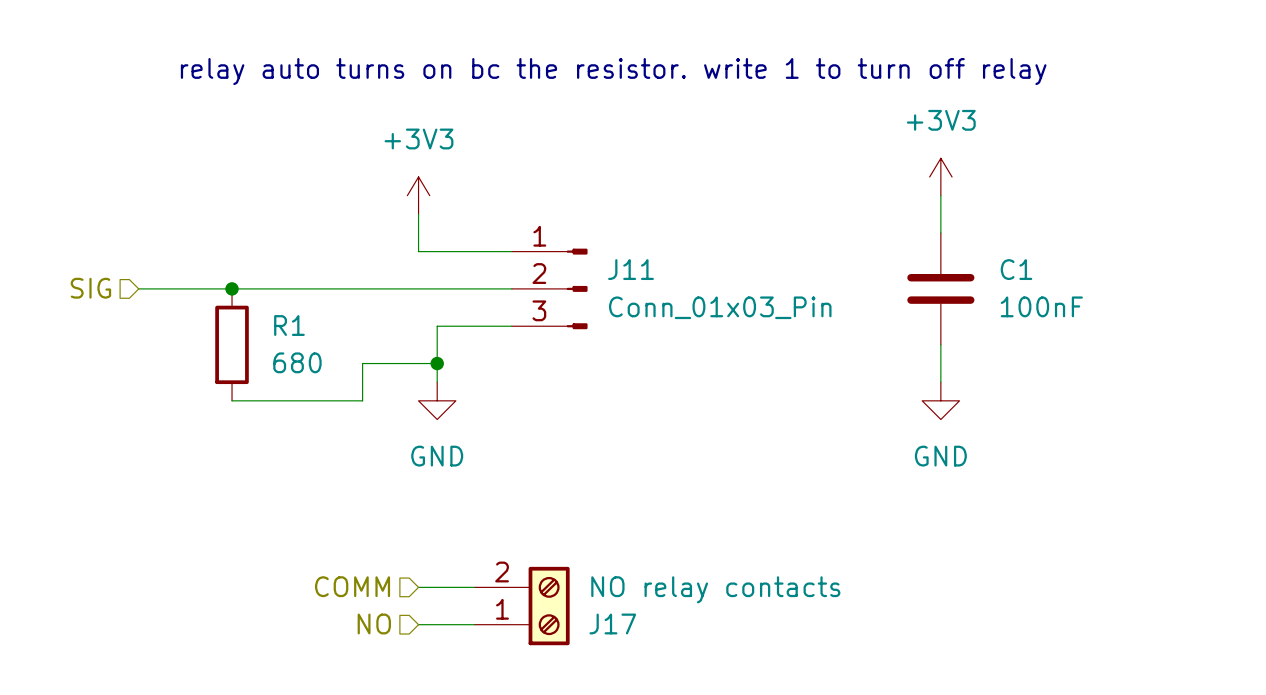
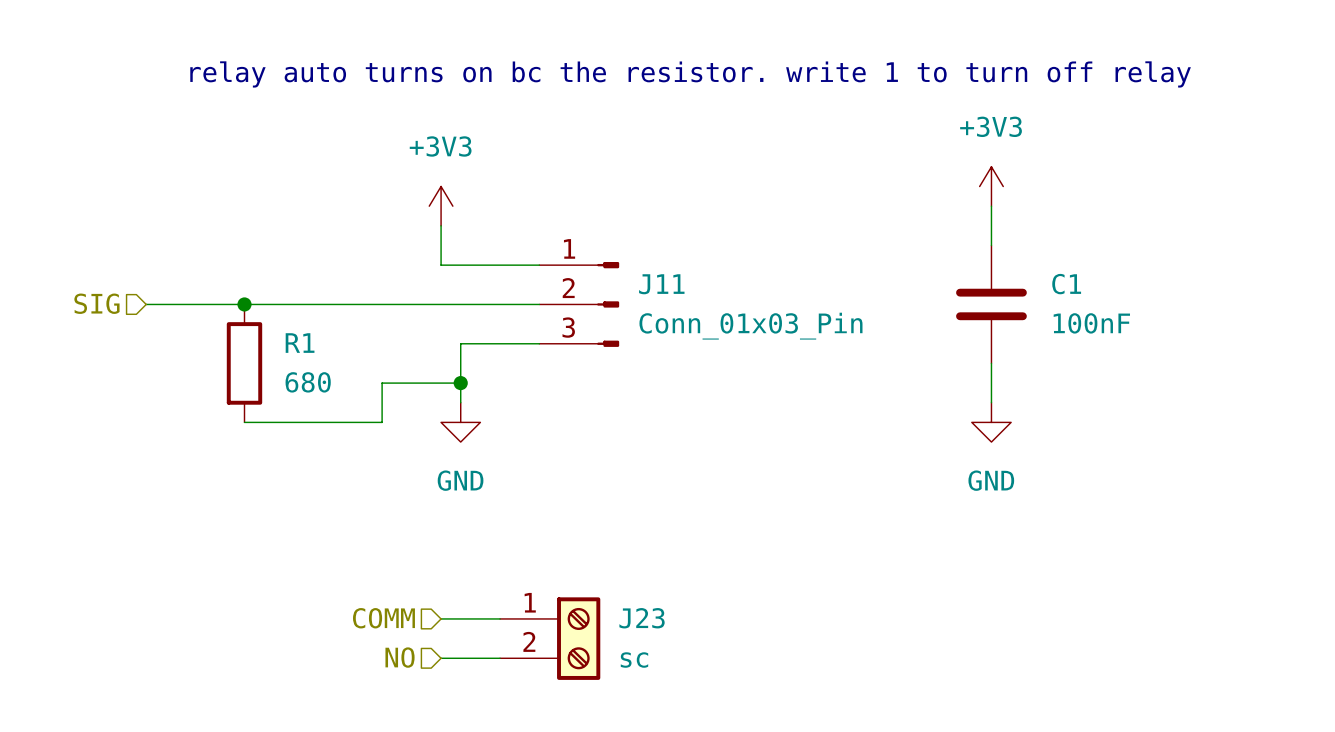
J17: NO relay contacts (522, 606) -> none
J23: none -> sc (550, 638)

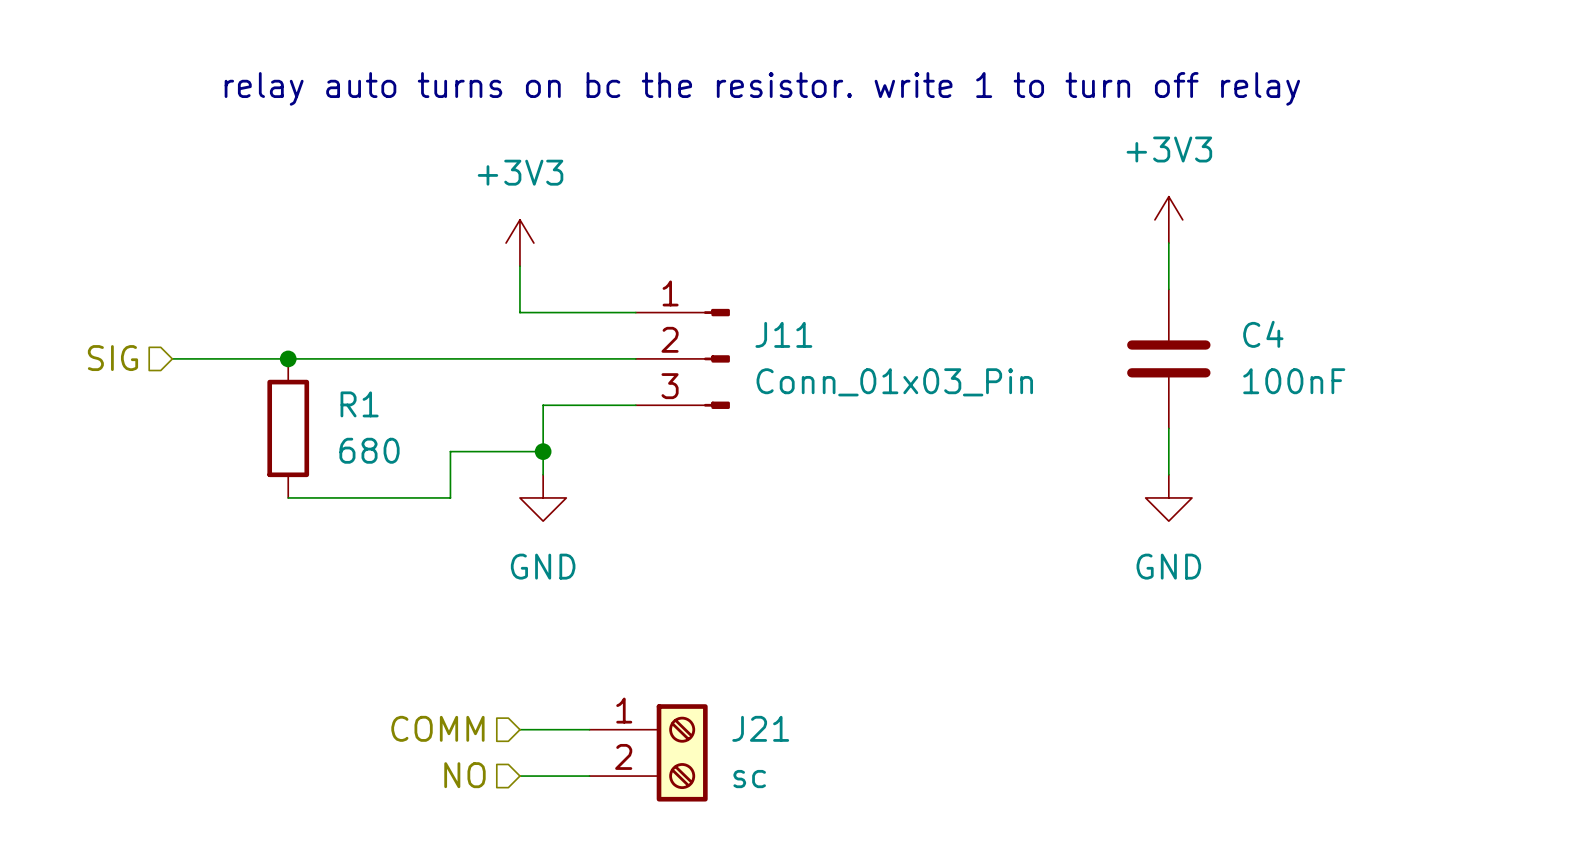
C1 name: C1 (1066, 284) -> C4 (1263, 334)
J23 name: J23 (642, 618) -> J21 (760, 728)

